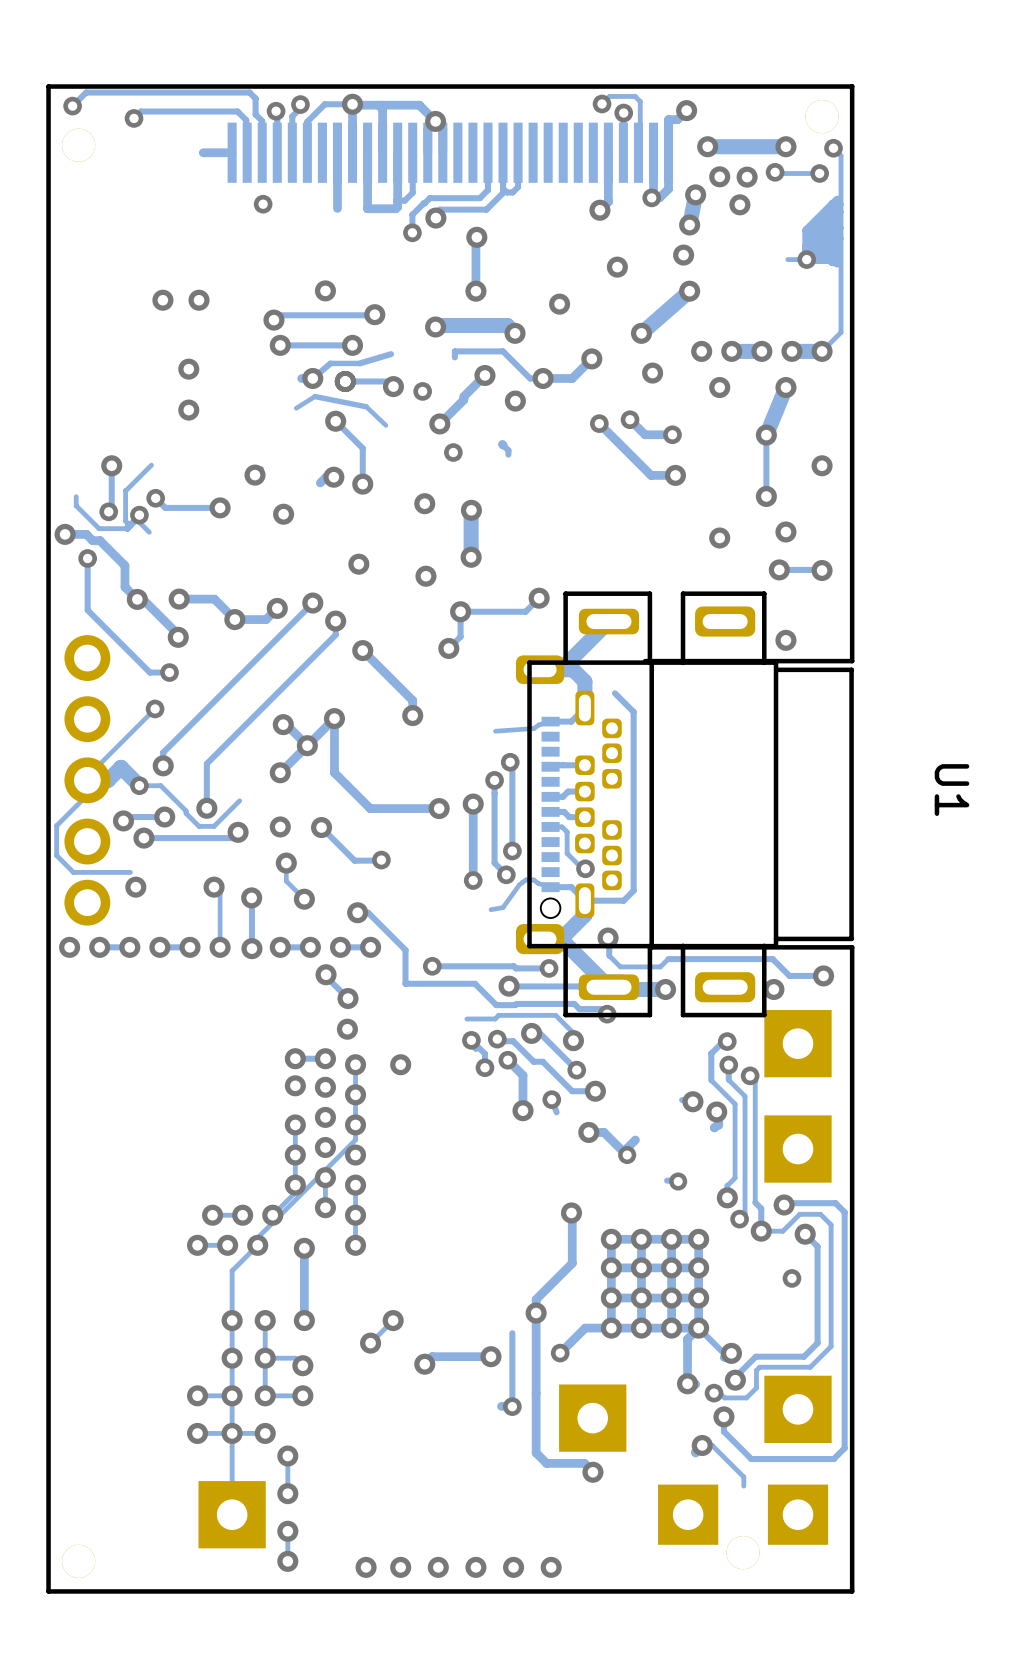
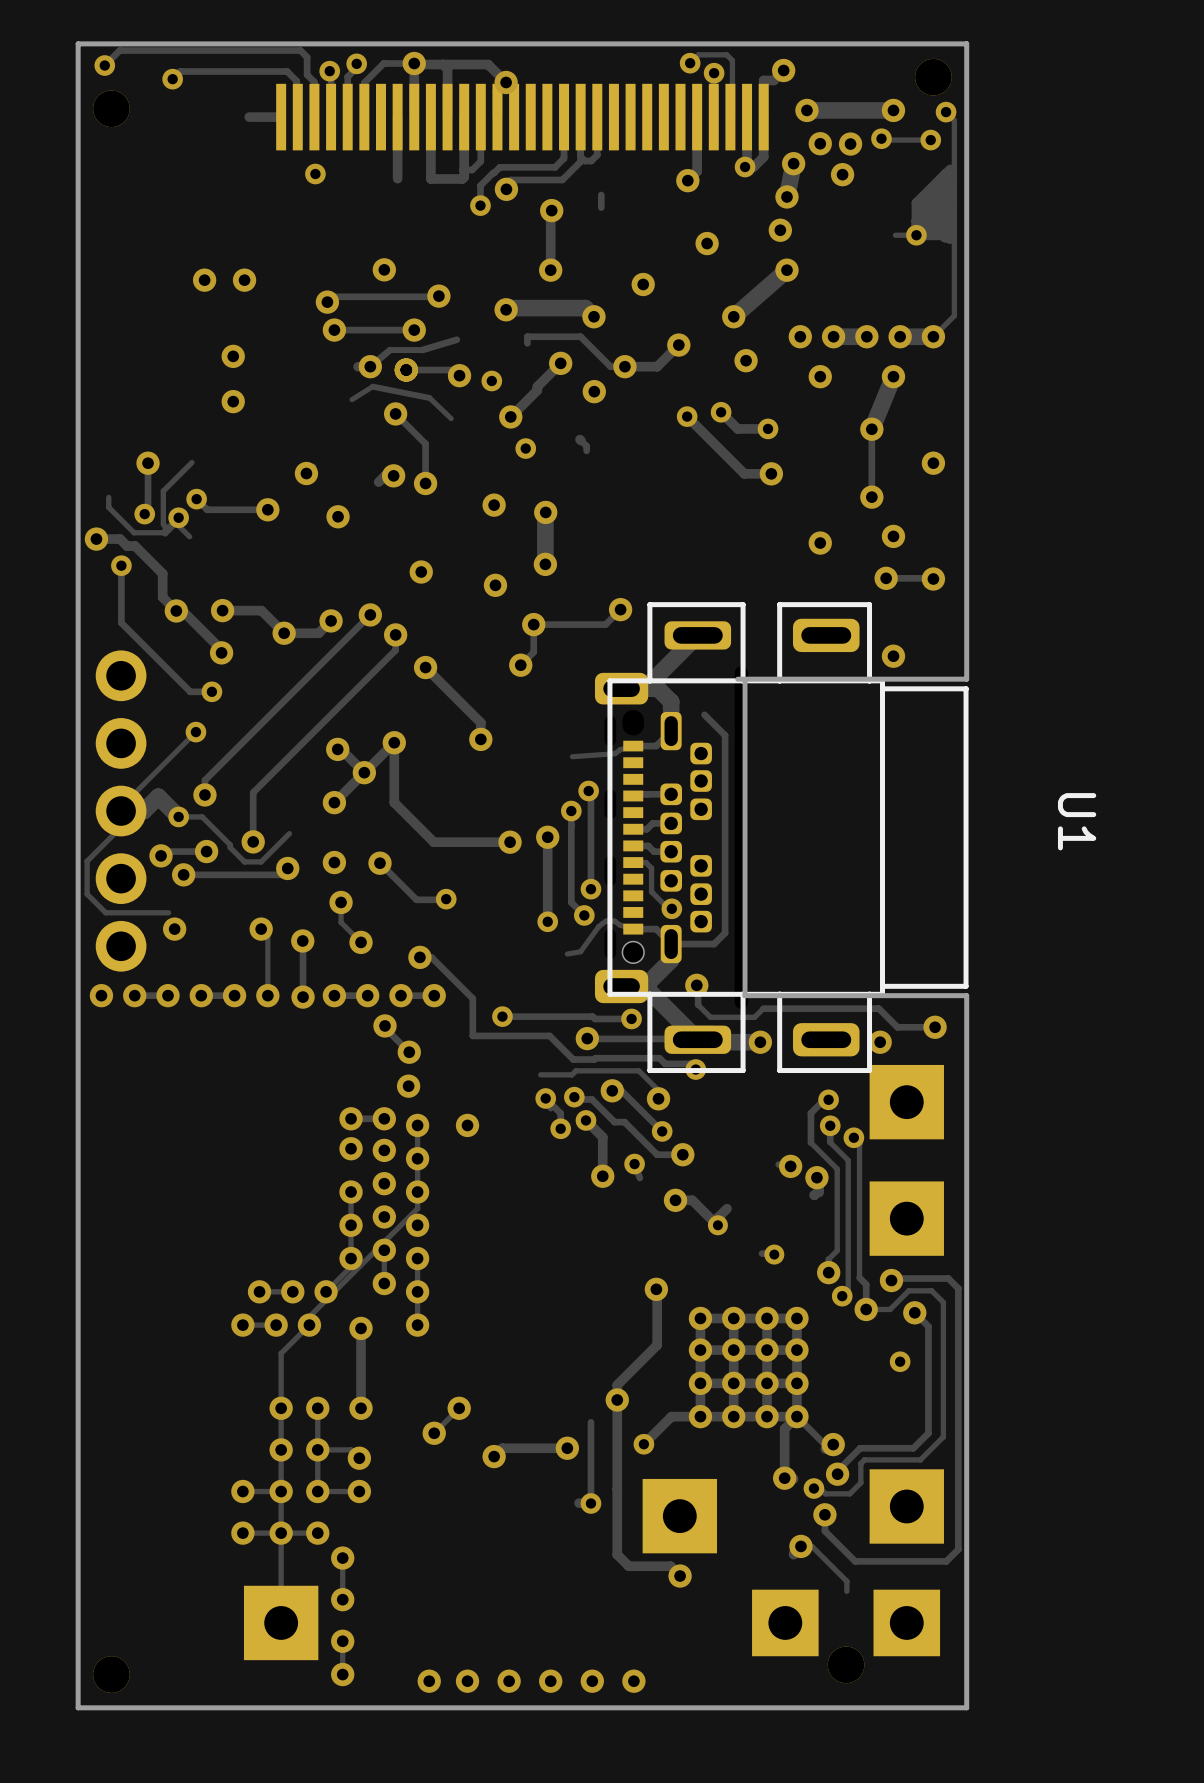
track: none -> (601, 194) (601, 207)

